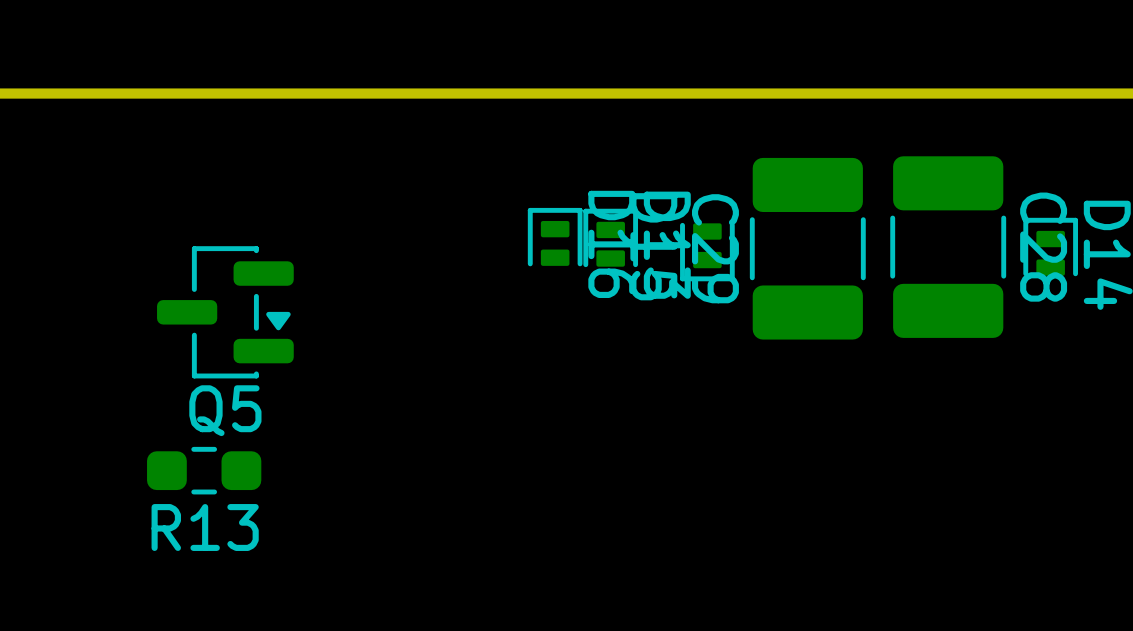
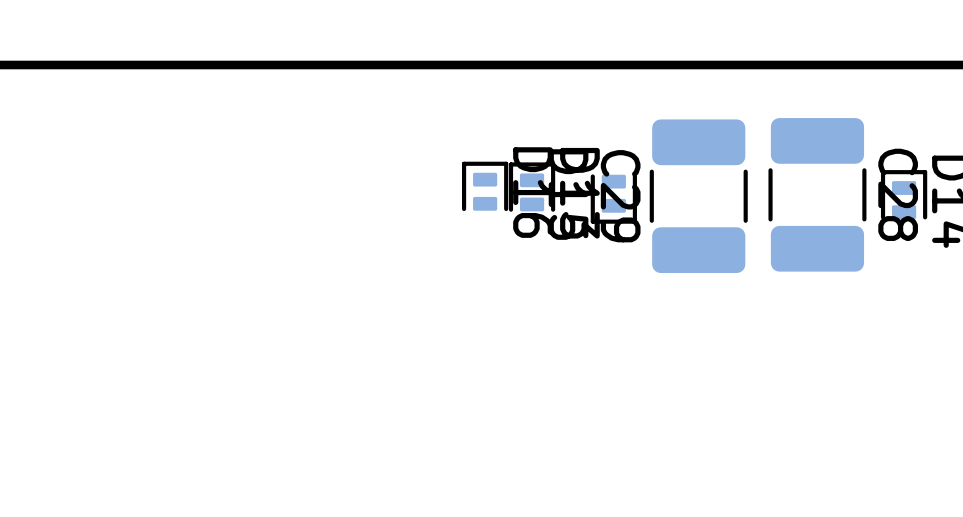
Q5: (225, 312) -> none
R13: (204, 470) -> none

